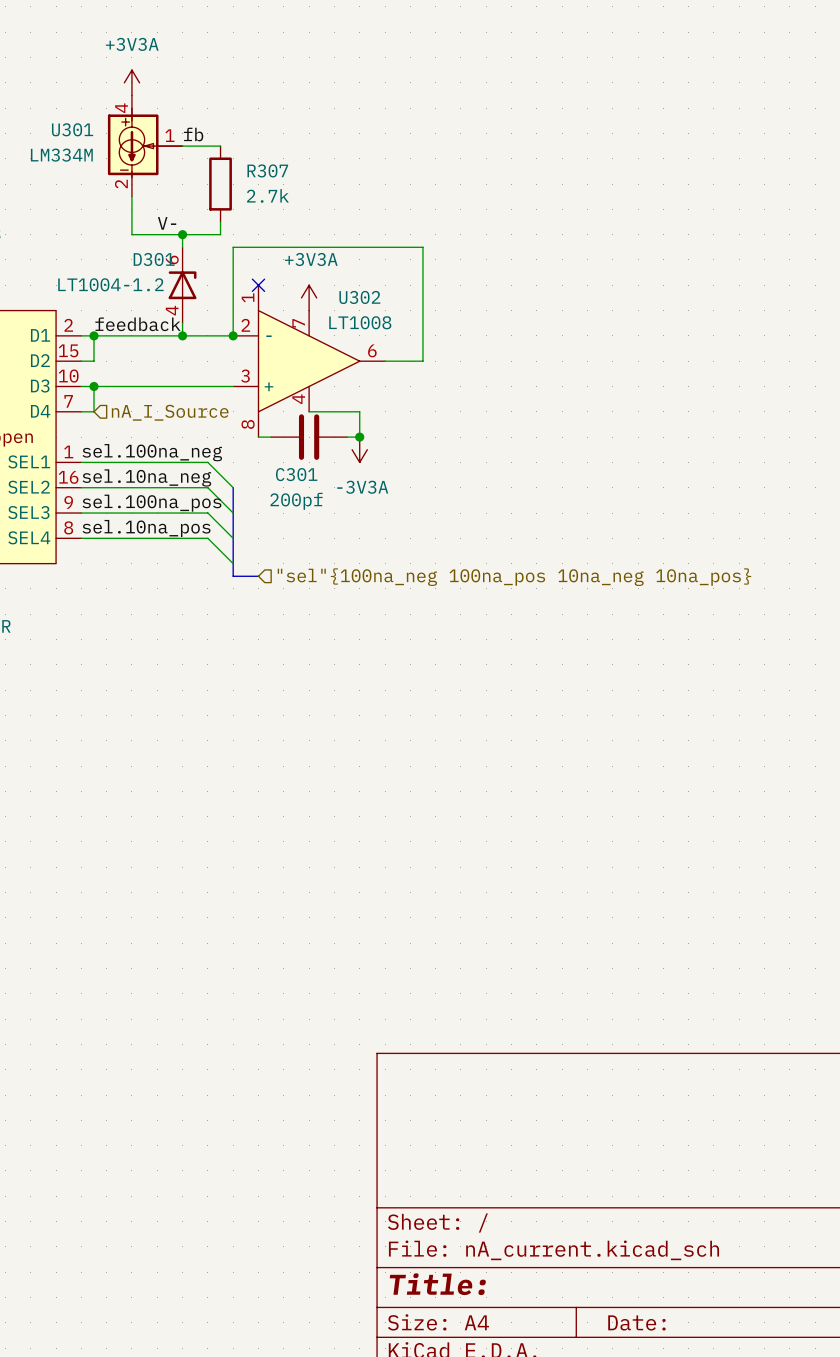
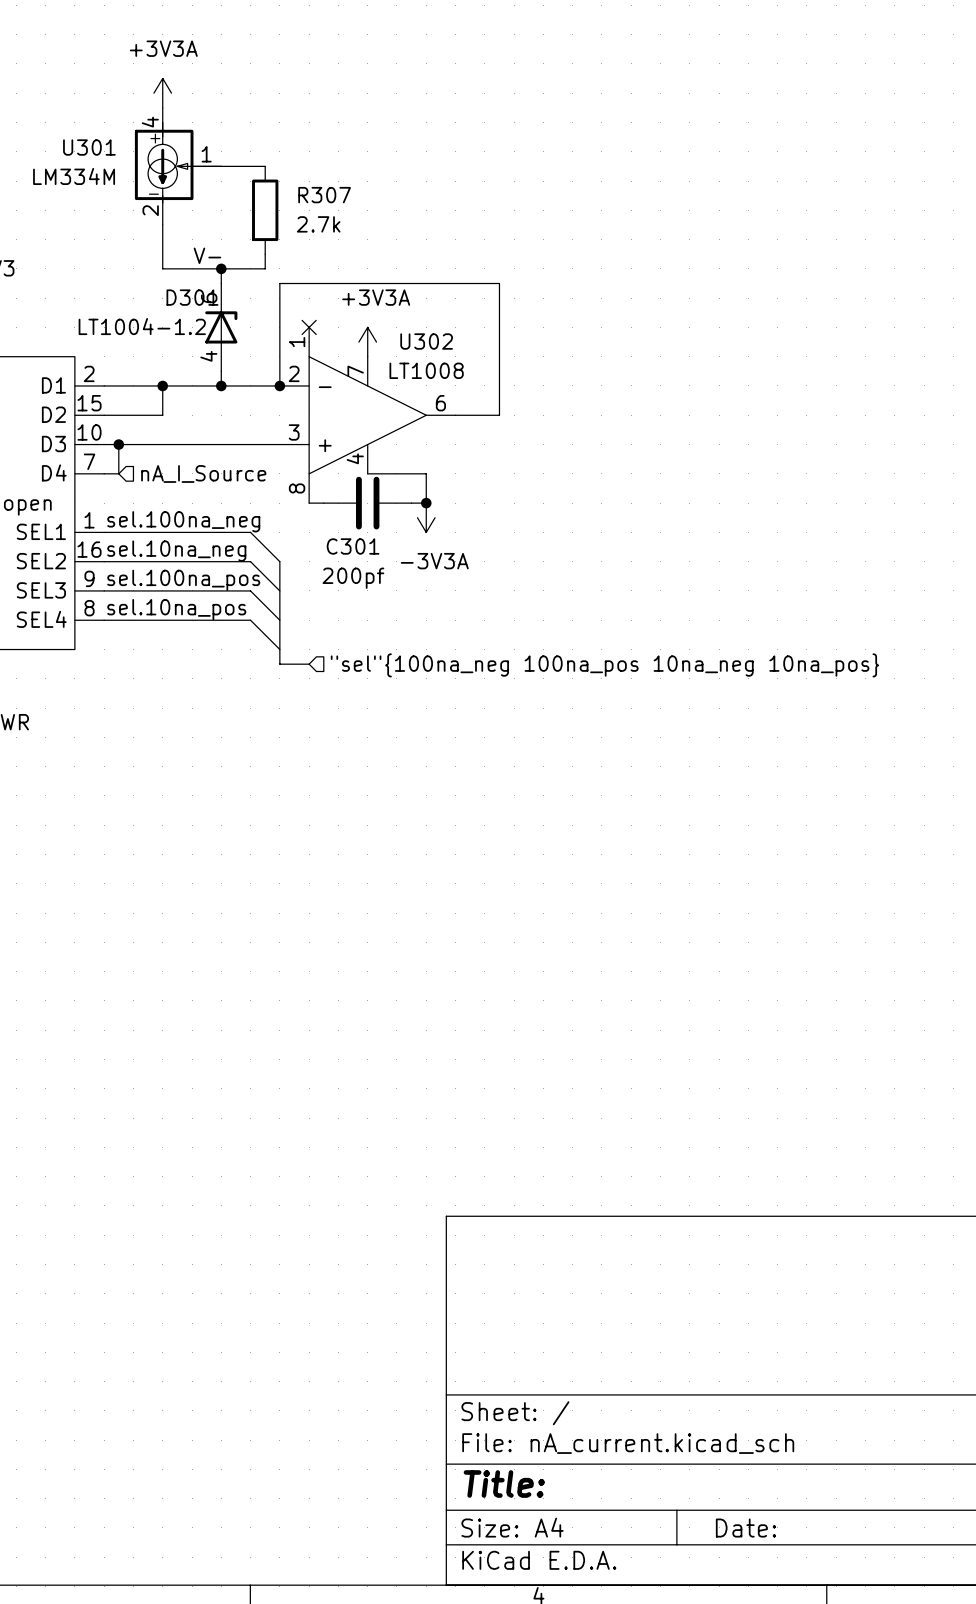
label: fb (193, 134) -> none
label: feedback (137, 324) -> none
wire: (94, 335) (94, 361) -> (162, 385) (162, 415) (118, 415)
junction position: (94, 335) -> (162, 385)

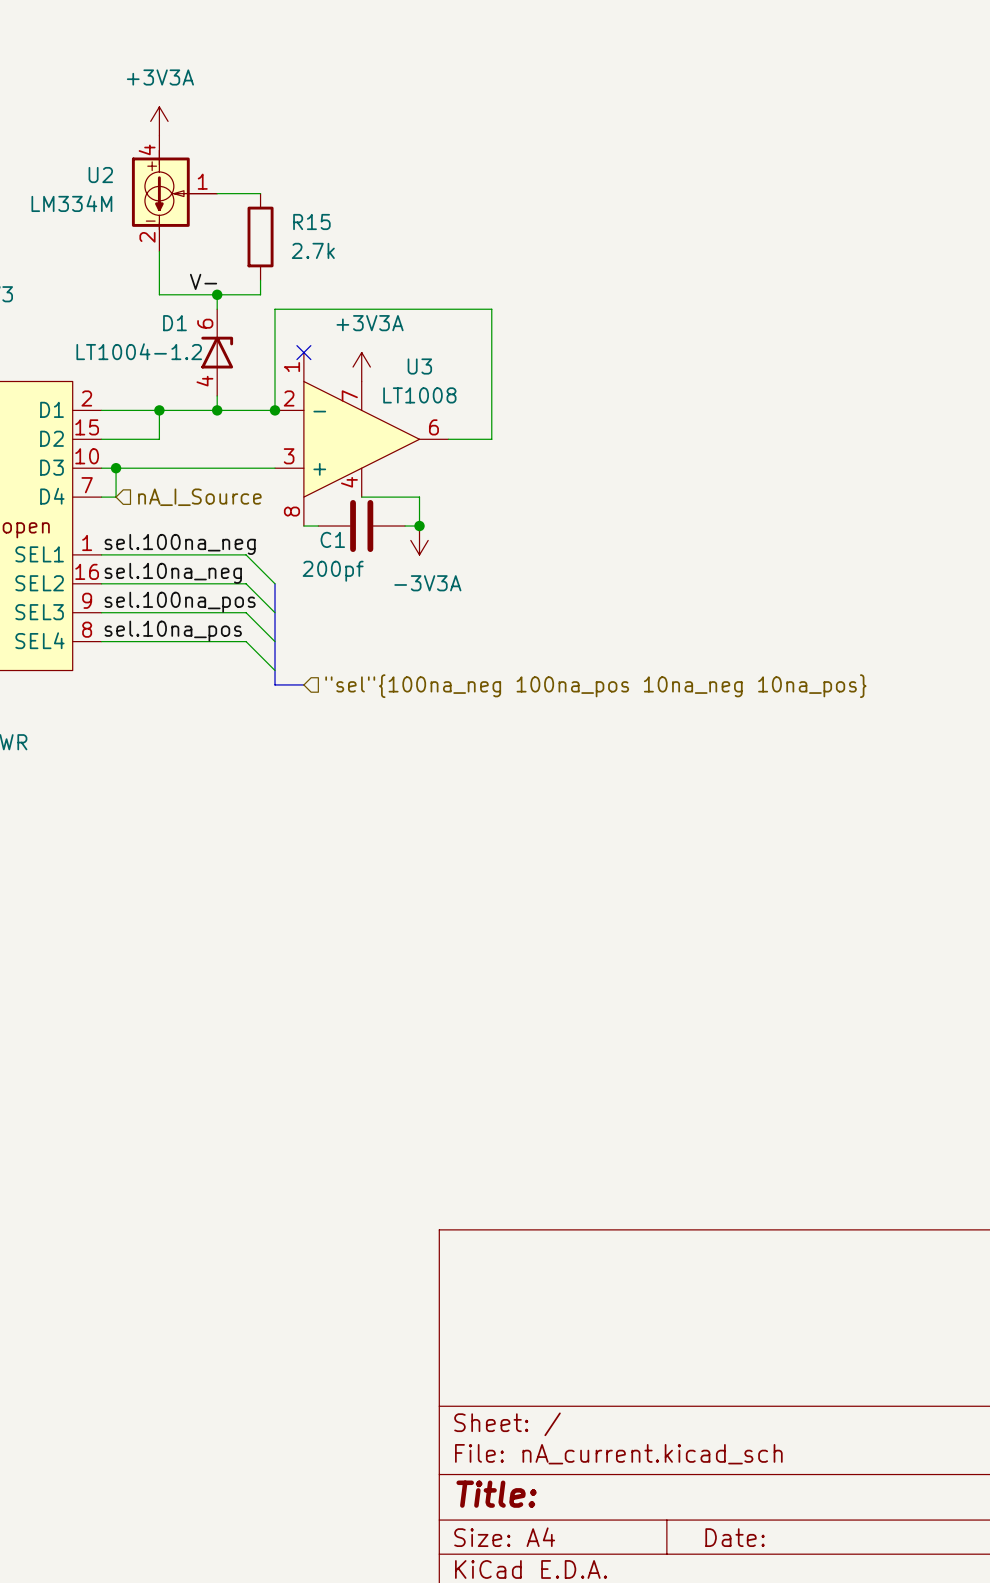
U301 name: U301 (89, 147) -> U2 (100, 175)
R307 name: R307 (324, 195) -> R15 (311, 221)
D301 name: D301 (192, 297) -> D1 (174, 323)
U302 name: U302 (426, 341) -> U3 (419, 366)
C301 name: C301 (353, 546) -> C1 (332, 539)
C301 value position: 200pf (353, 578) -> 200pf (333, 571)

